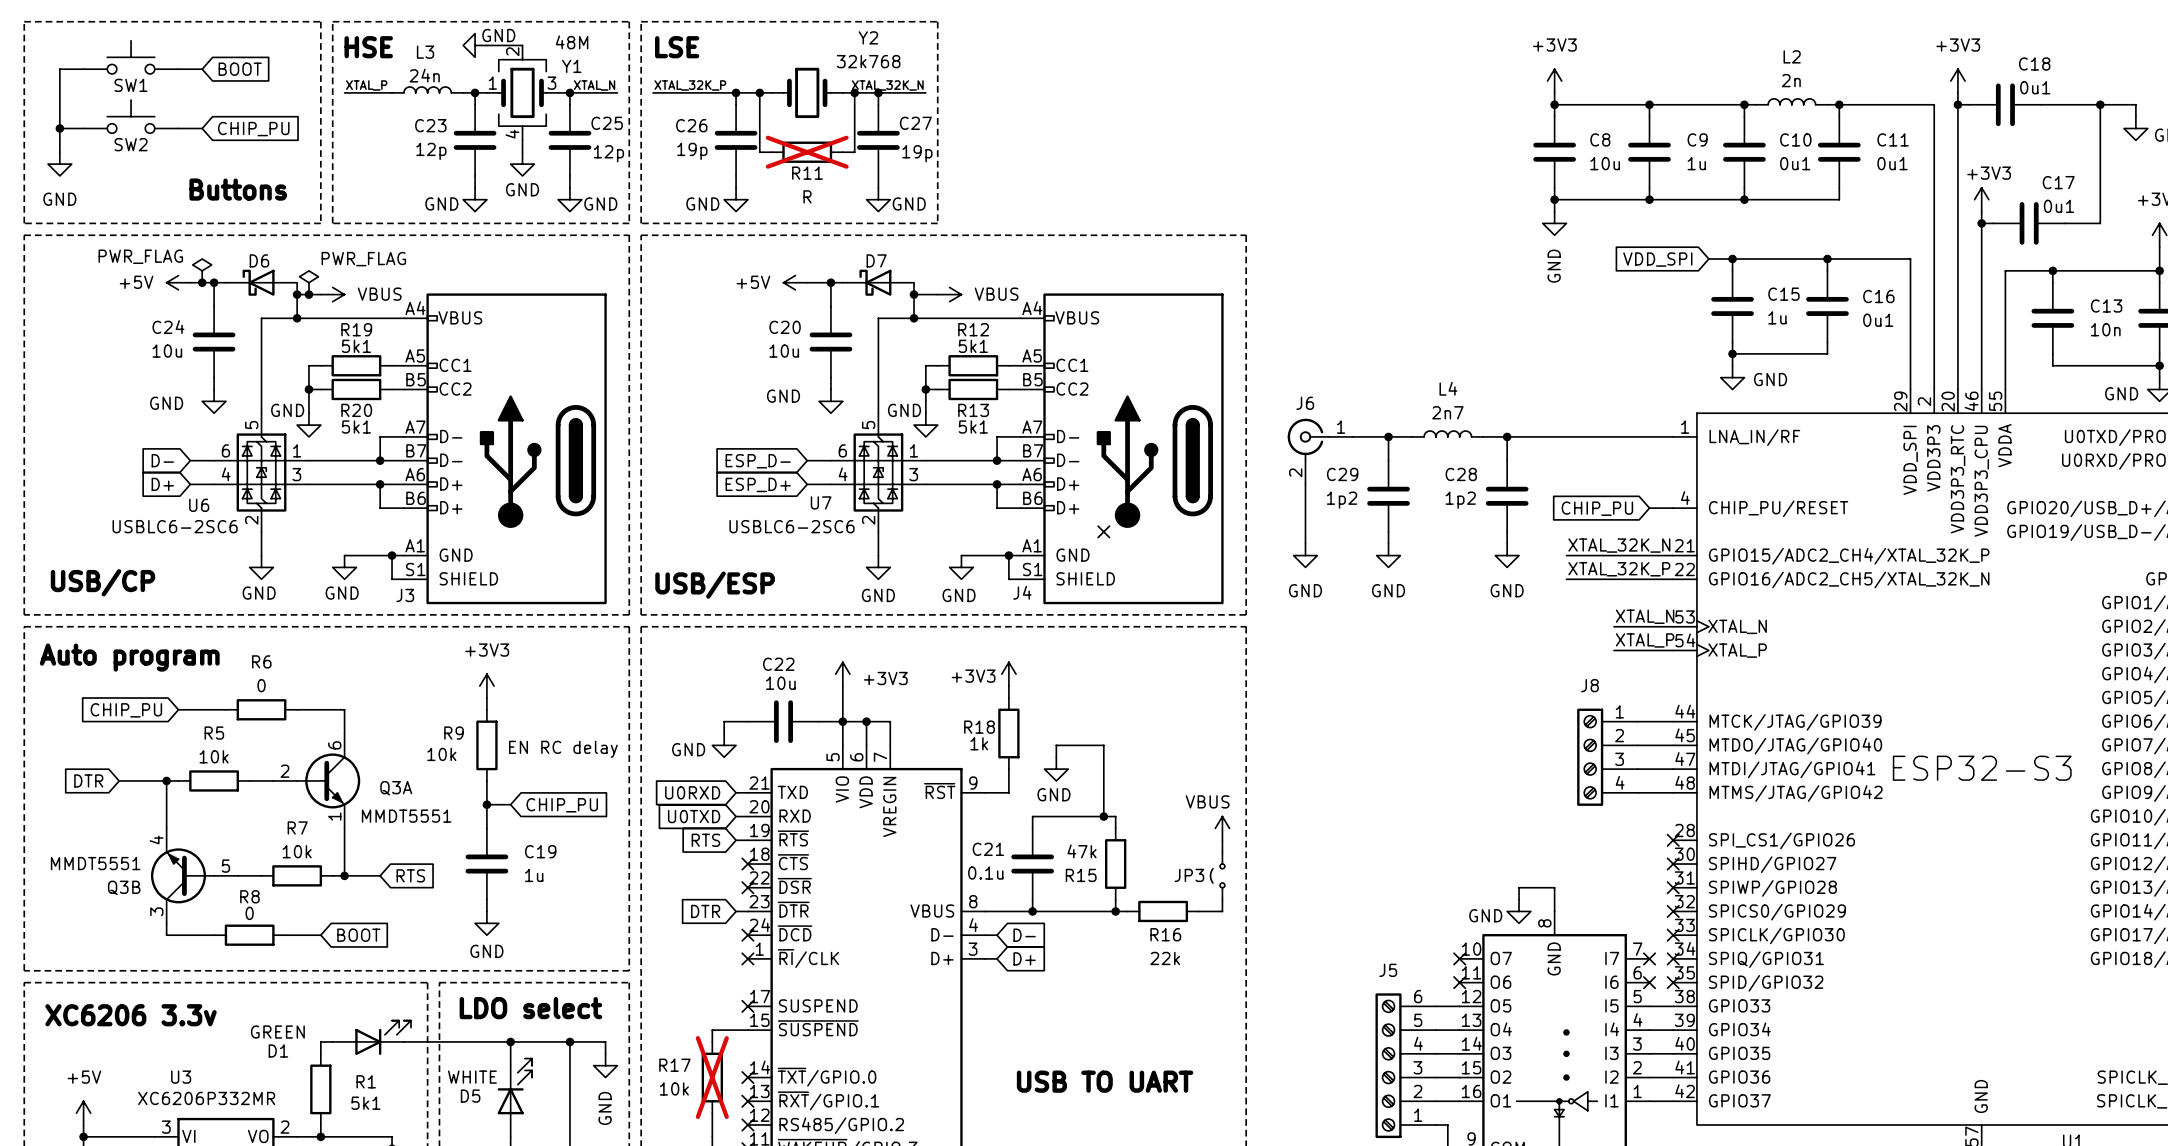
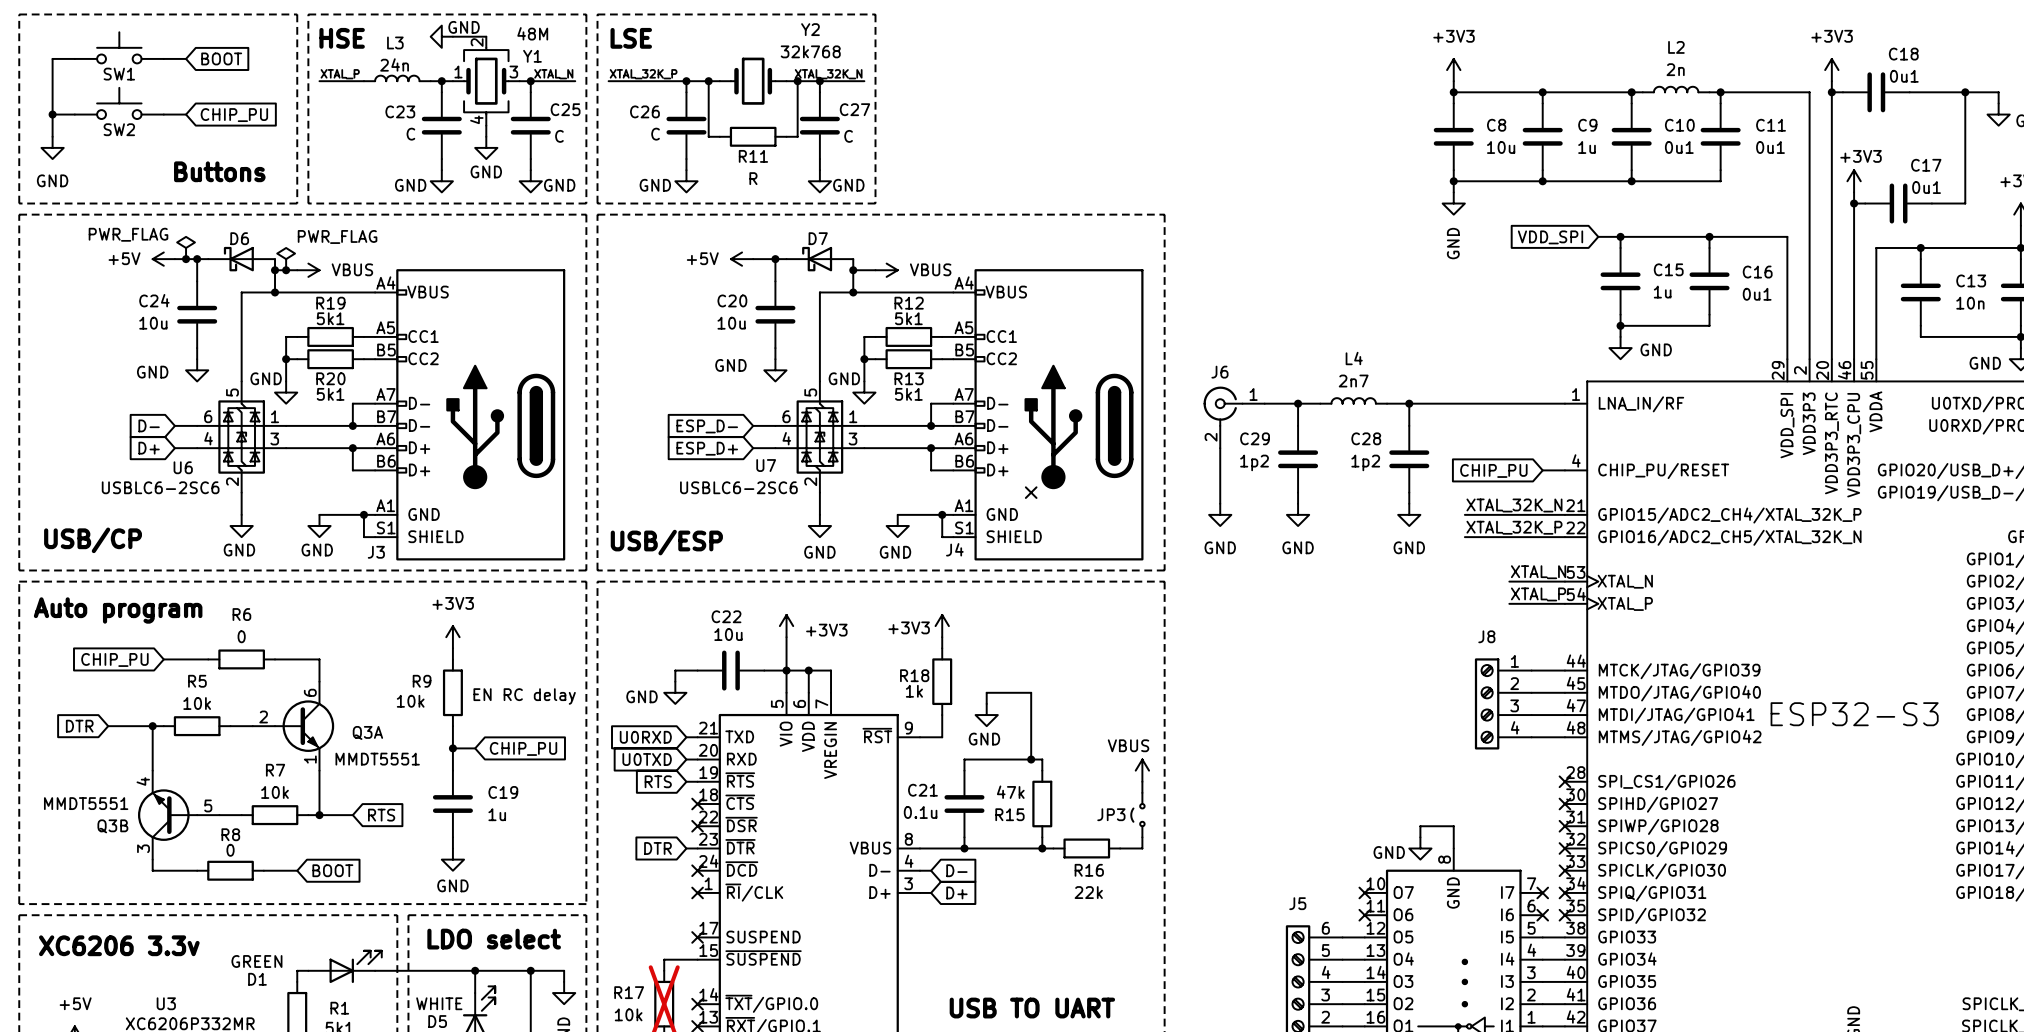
C23 value: 12p (431, 151) -> C (410, 134)
C26 value: 19p (692, 151) -> C (655, 134)
R11 do-not-place cross: (807, 152) -> none
C25 value: 12p (608, 153) -> C (559, 136)
C27 value: 19p (917, 153) -> C (848, 136)

